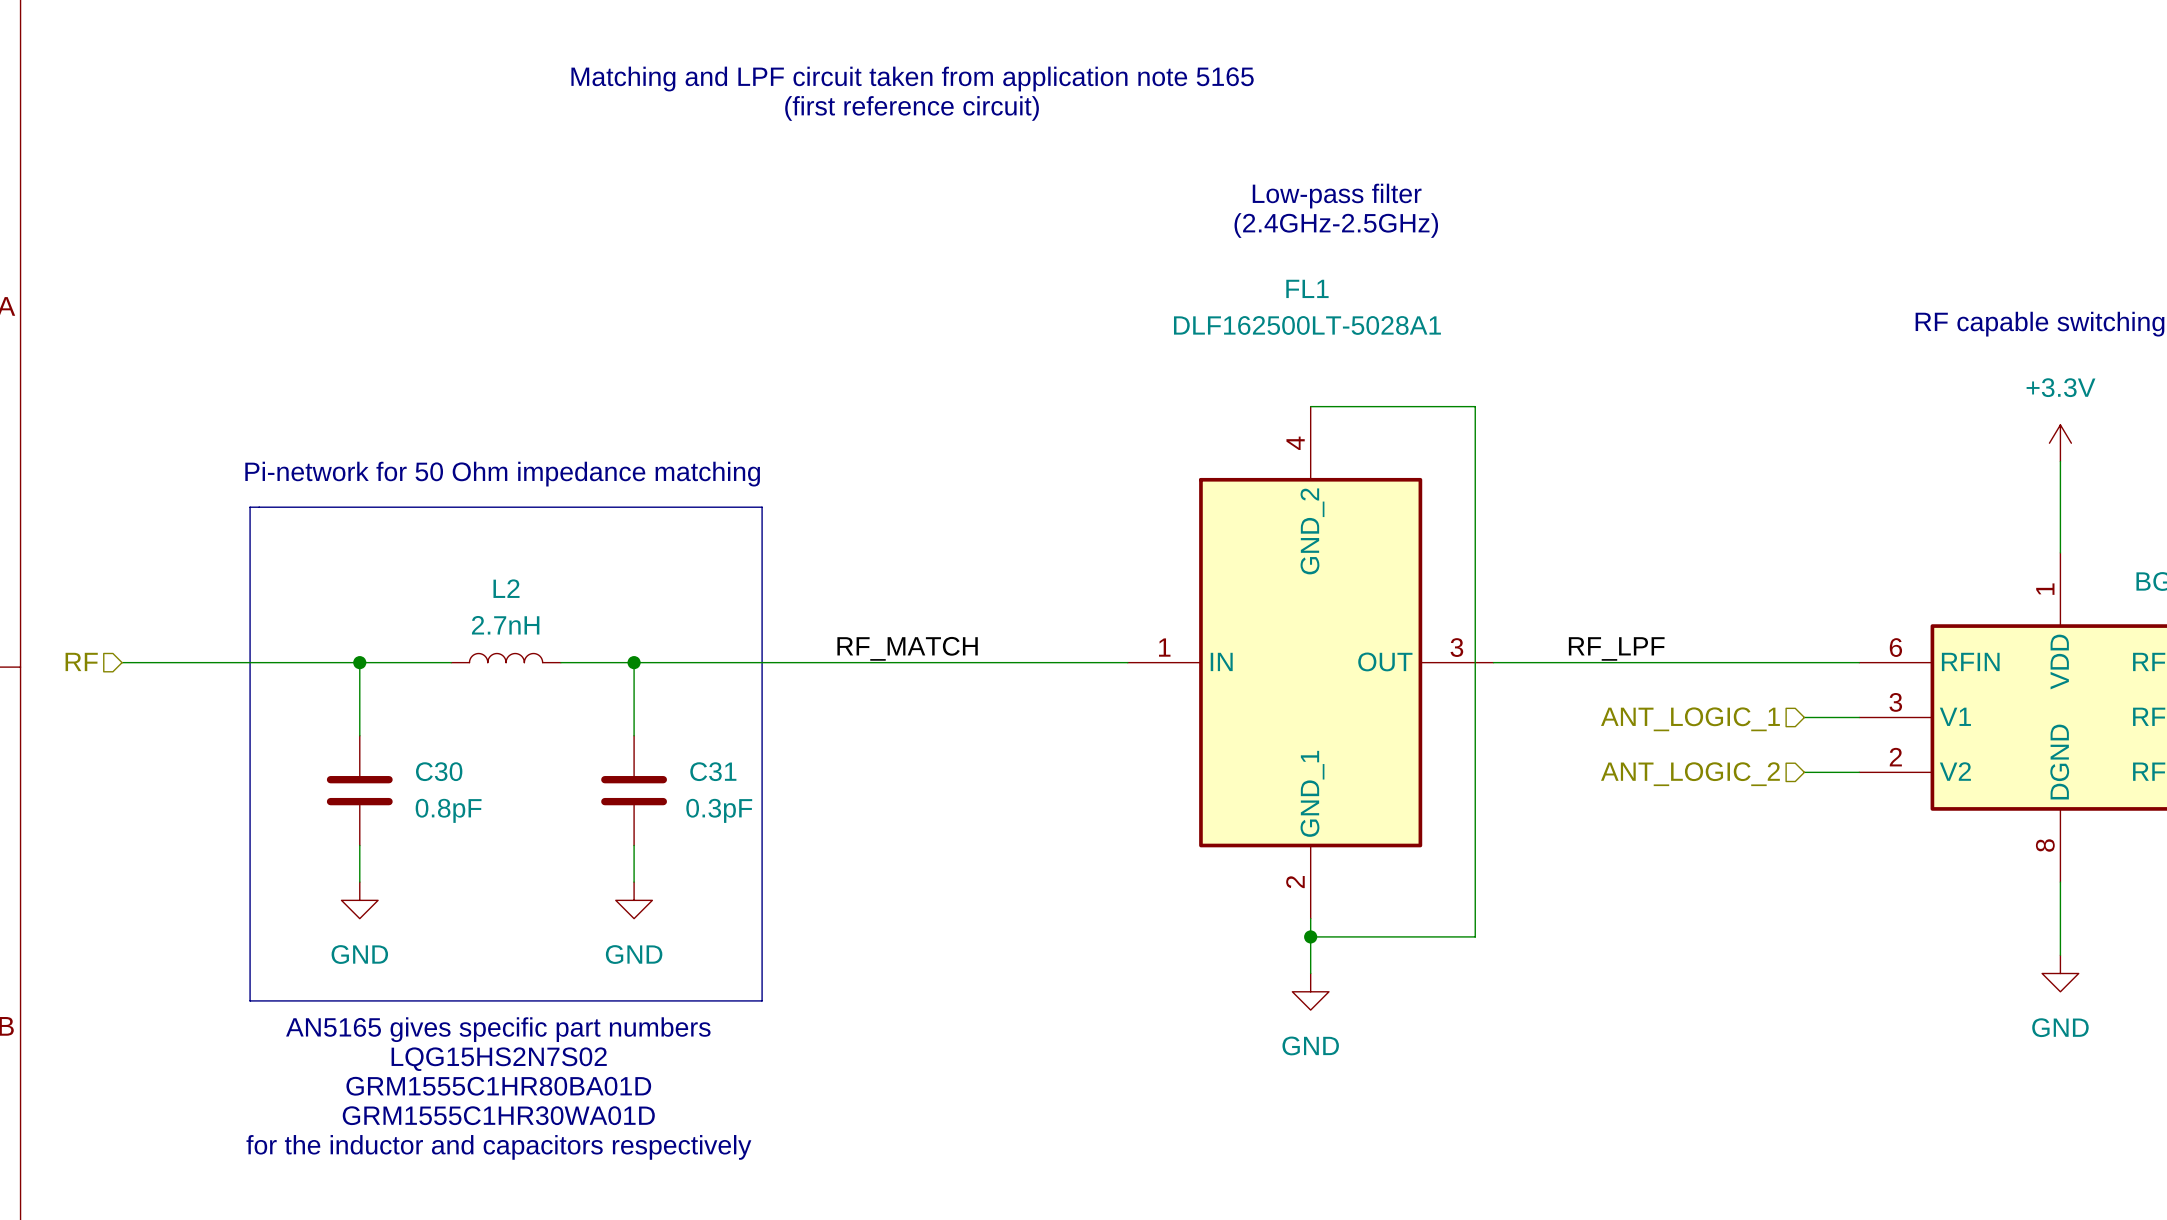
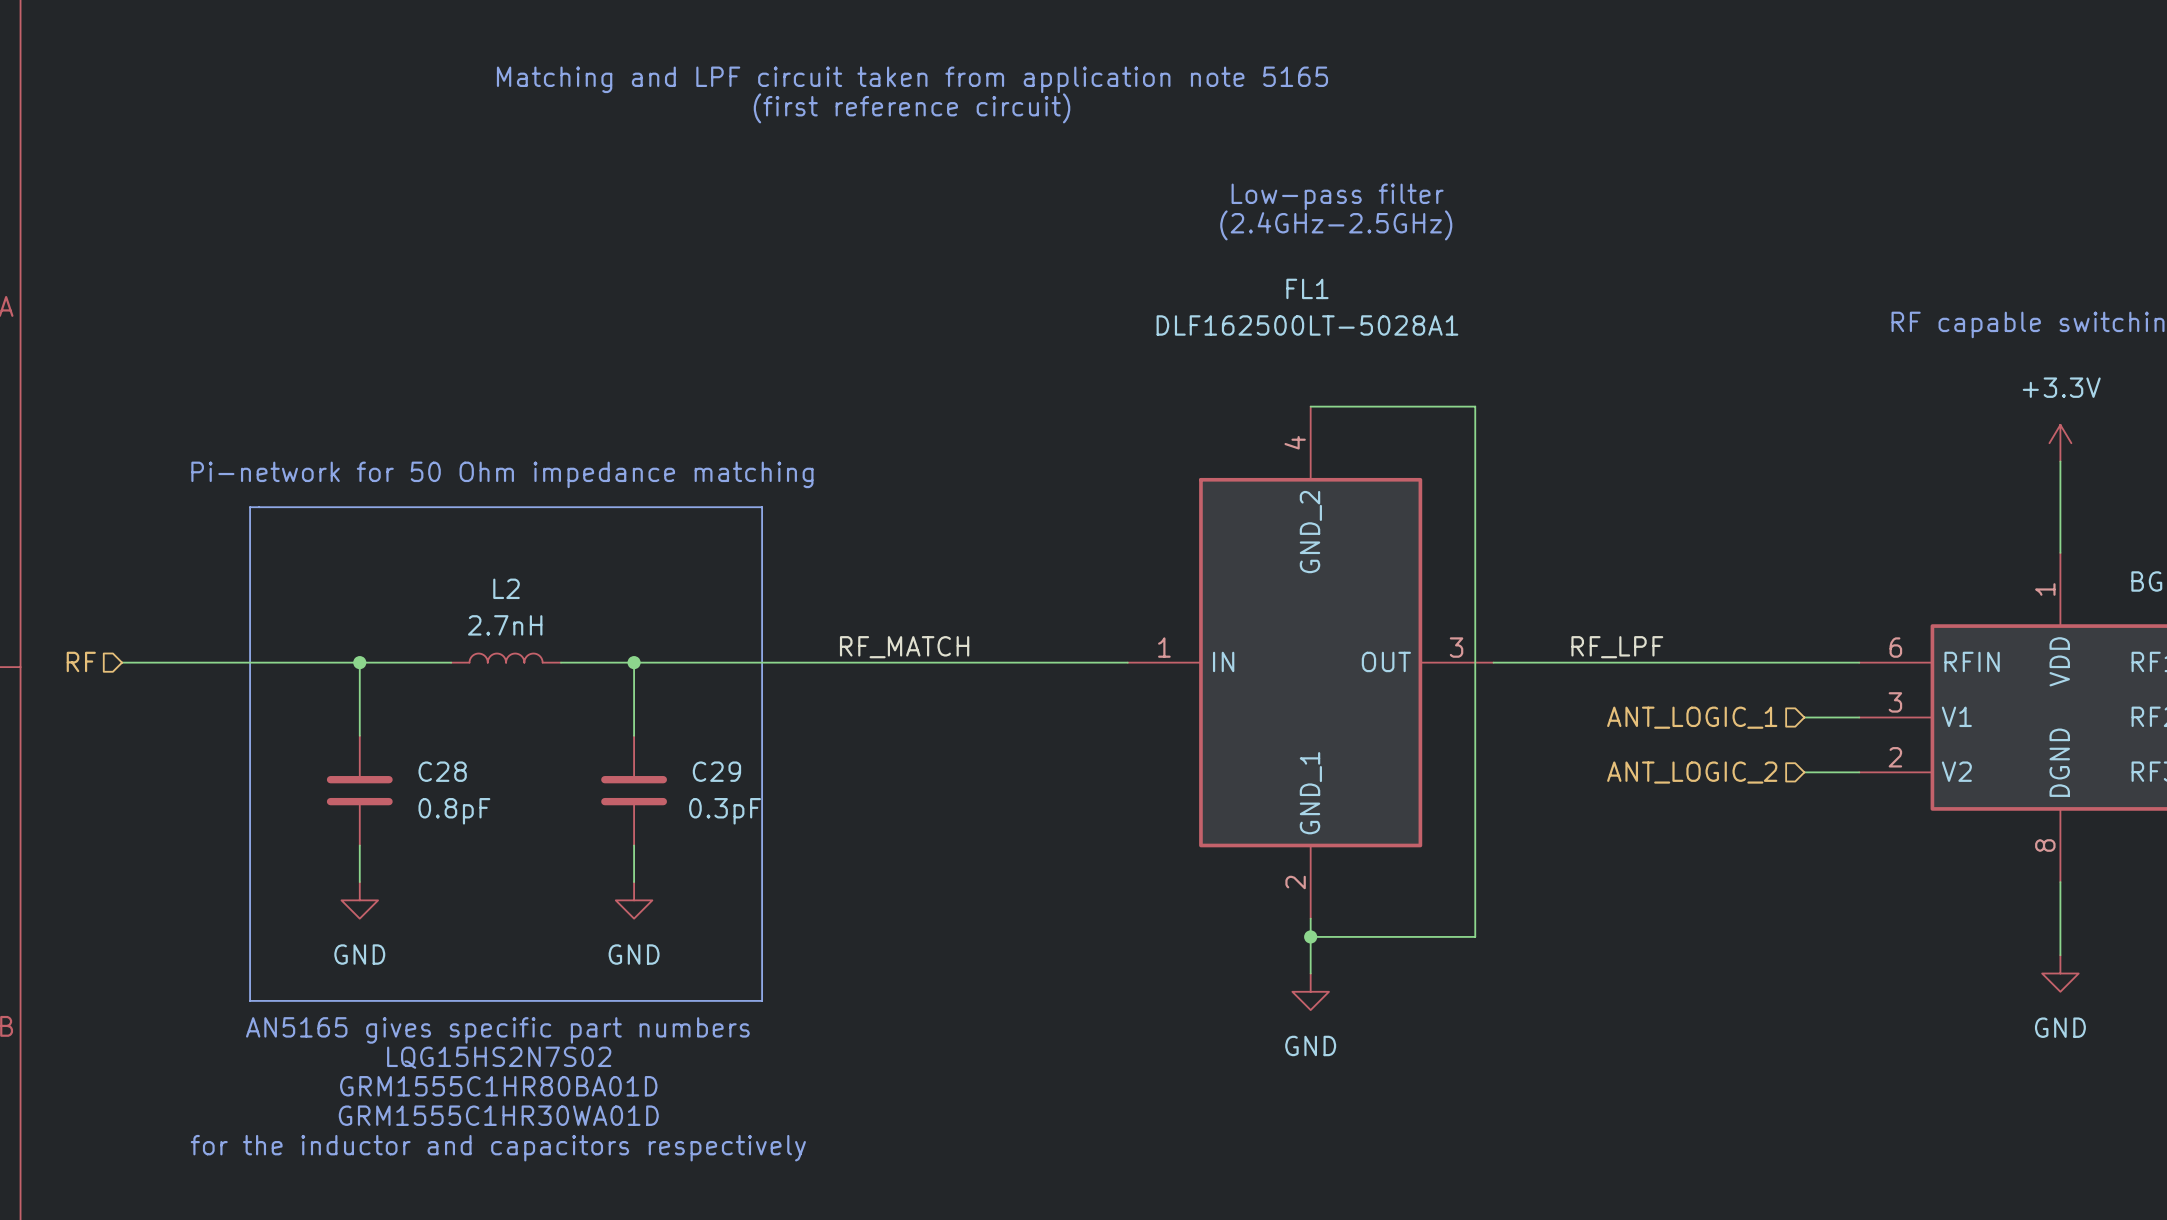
C30 name: C30 (439, 771) -> C28 (442, 771)
C31 name: C31 (713, 771) -> C29 (716, 771)

